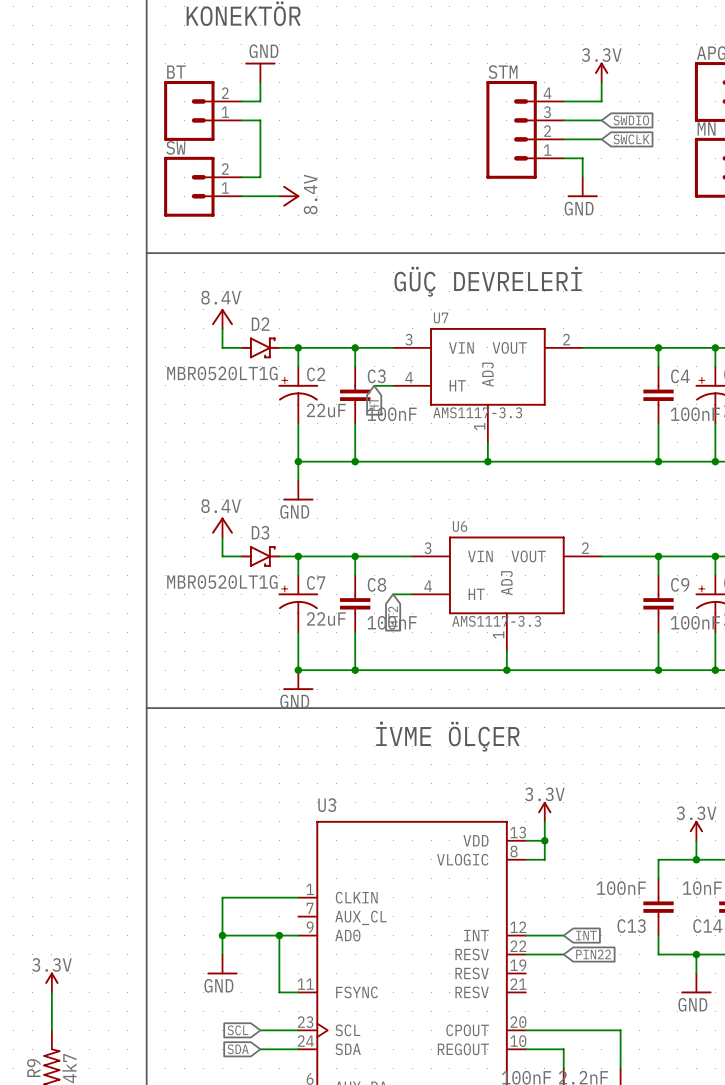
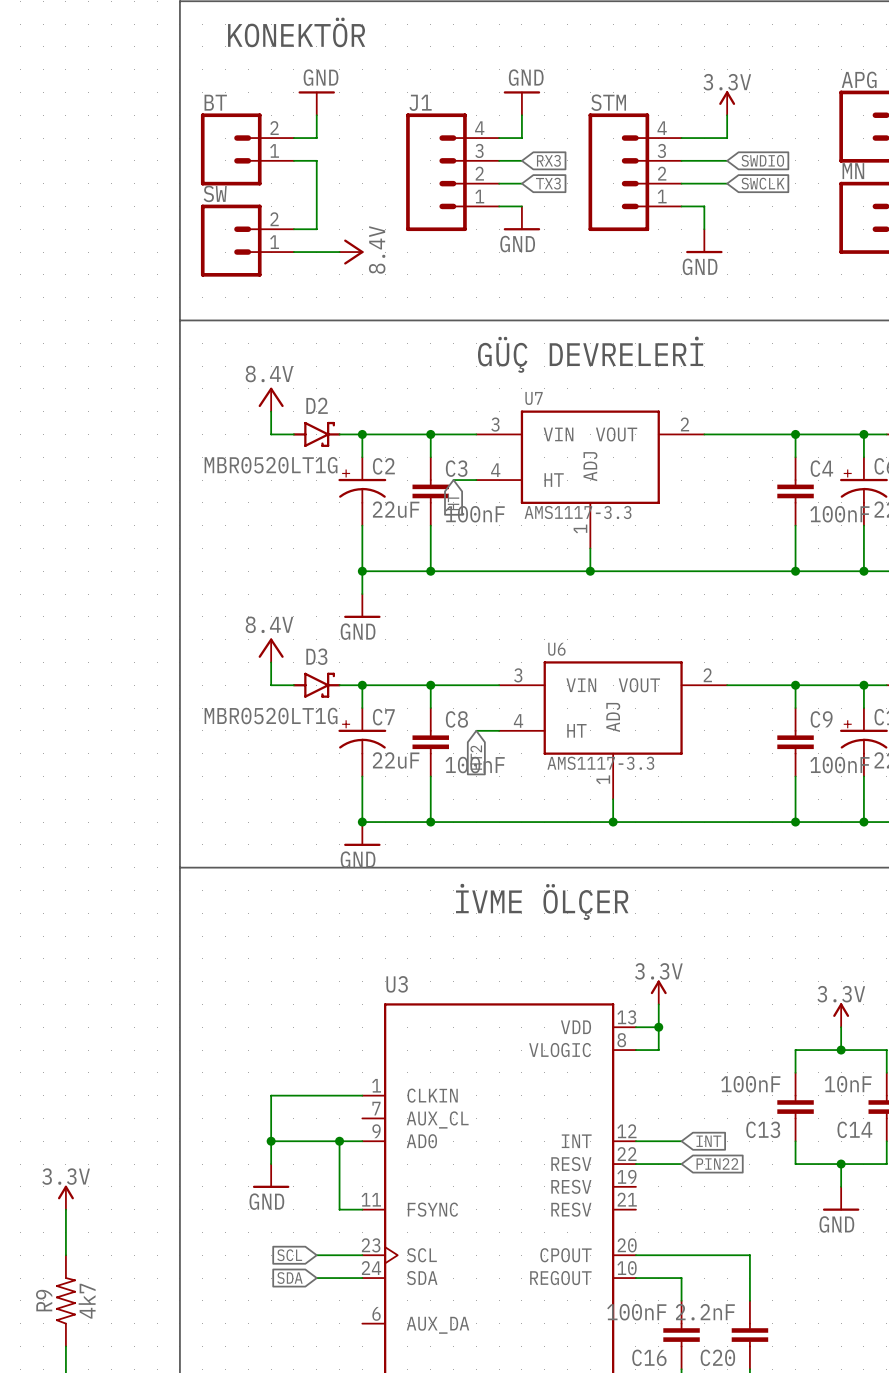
power symbol: none -> GND (521, 103)
wire: none -> (521, 115) (521, 138) (499, 138)
wire: none -> (499, 160) (521, 160)
global label: none -> RX3 (548, 160)
J1: none -> (452, 172)
wire: none -> (499, 183) (521, 183)
global label: none -> TX3 (548, 183)
wire: none -> (499, 206) (521, 206)
power symbol: none -> GND (521, 218)

